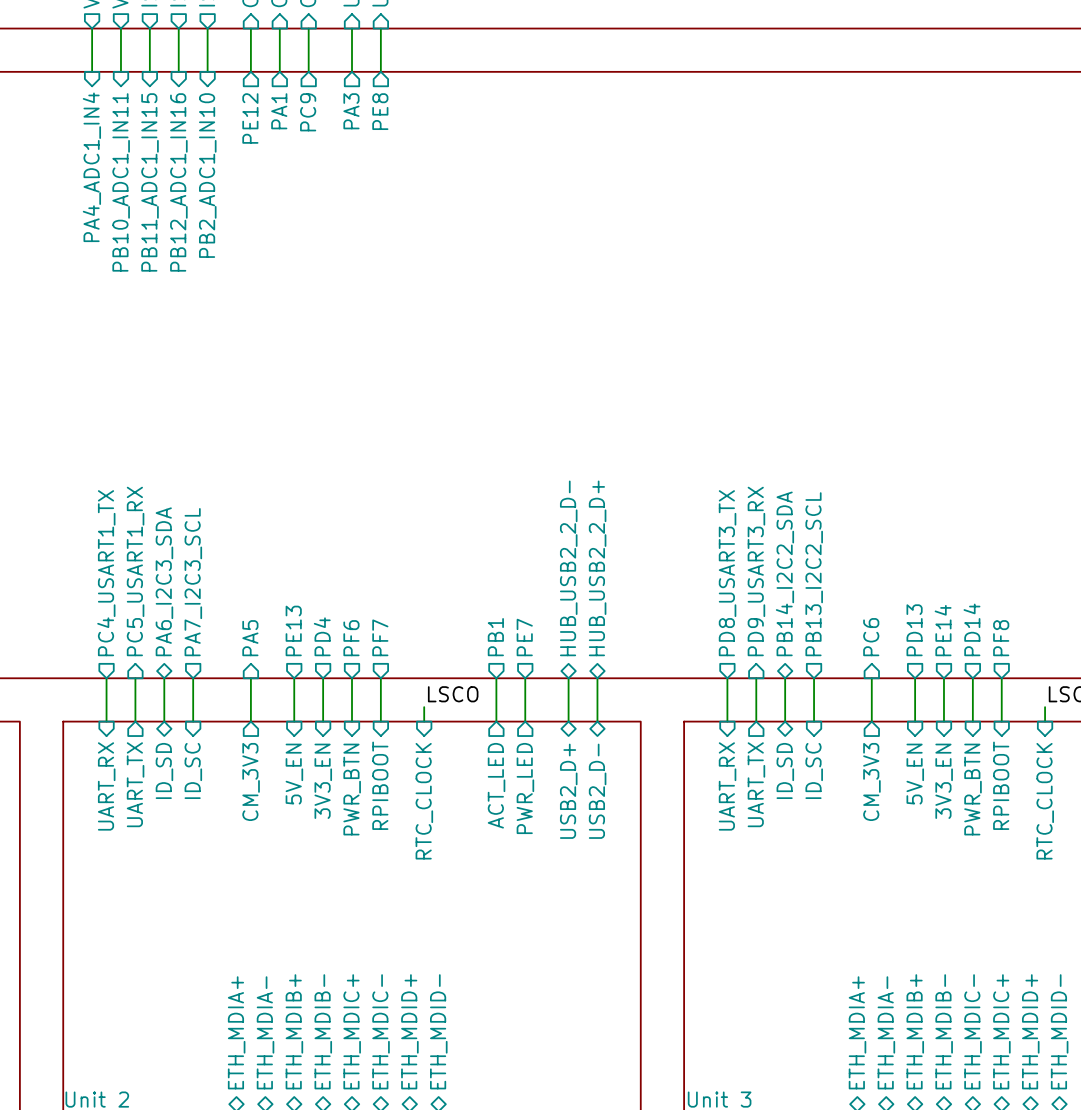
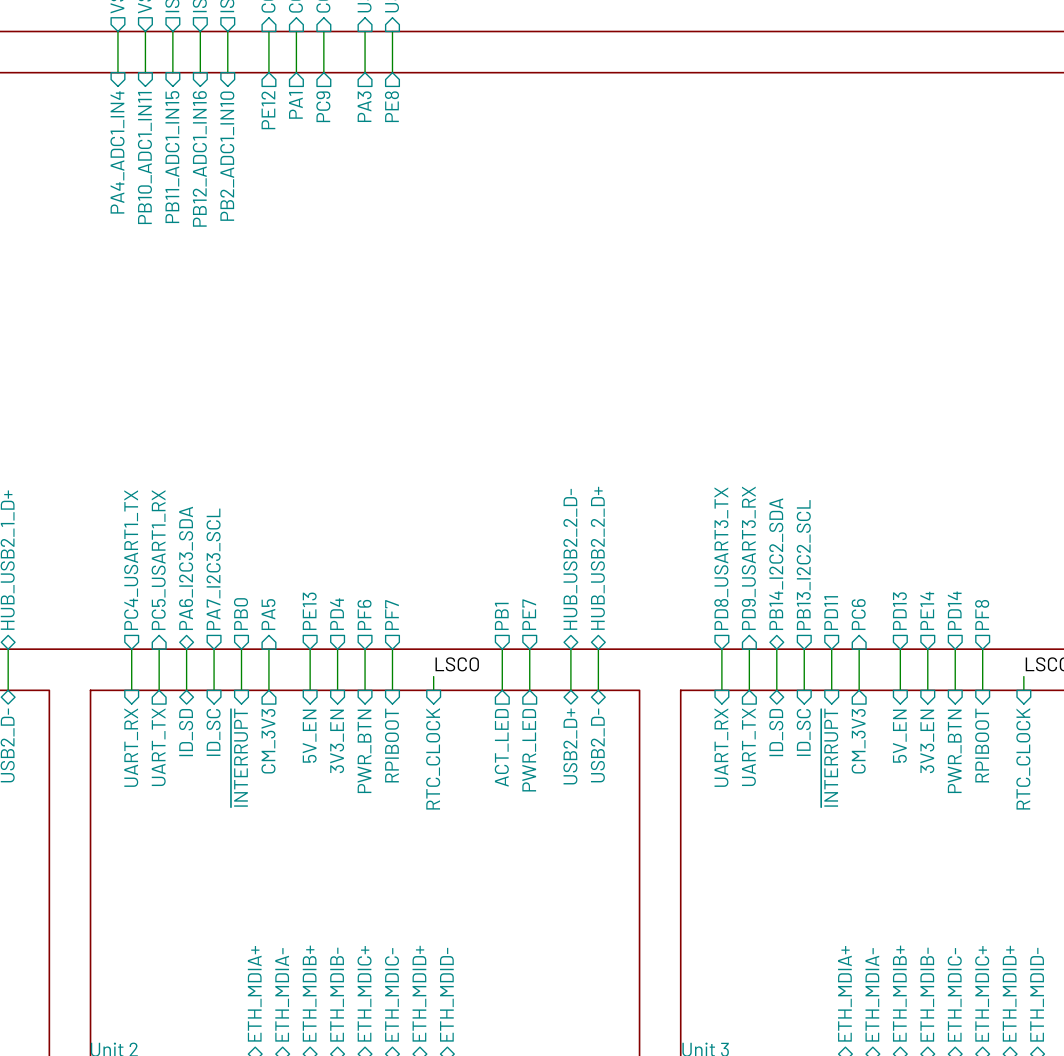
sheet pin: none -> PD11 (831, 613)
sheet pin: none -> PB0 (241, 614)
wire: none -> (241, 649) (241, 690)
wire: none -> (831, 649) (831, 690)
sheet pin: none -> ~{INTERRUPT} (239, 757)
sheet pin: none -> ~{INTERRUPT} (829, 757)

